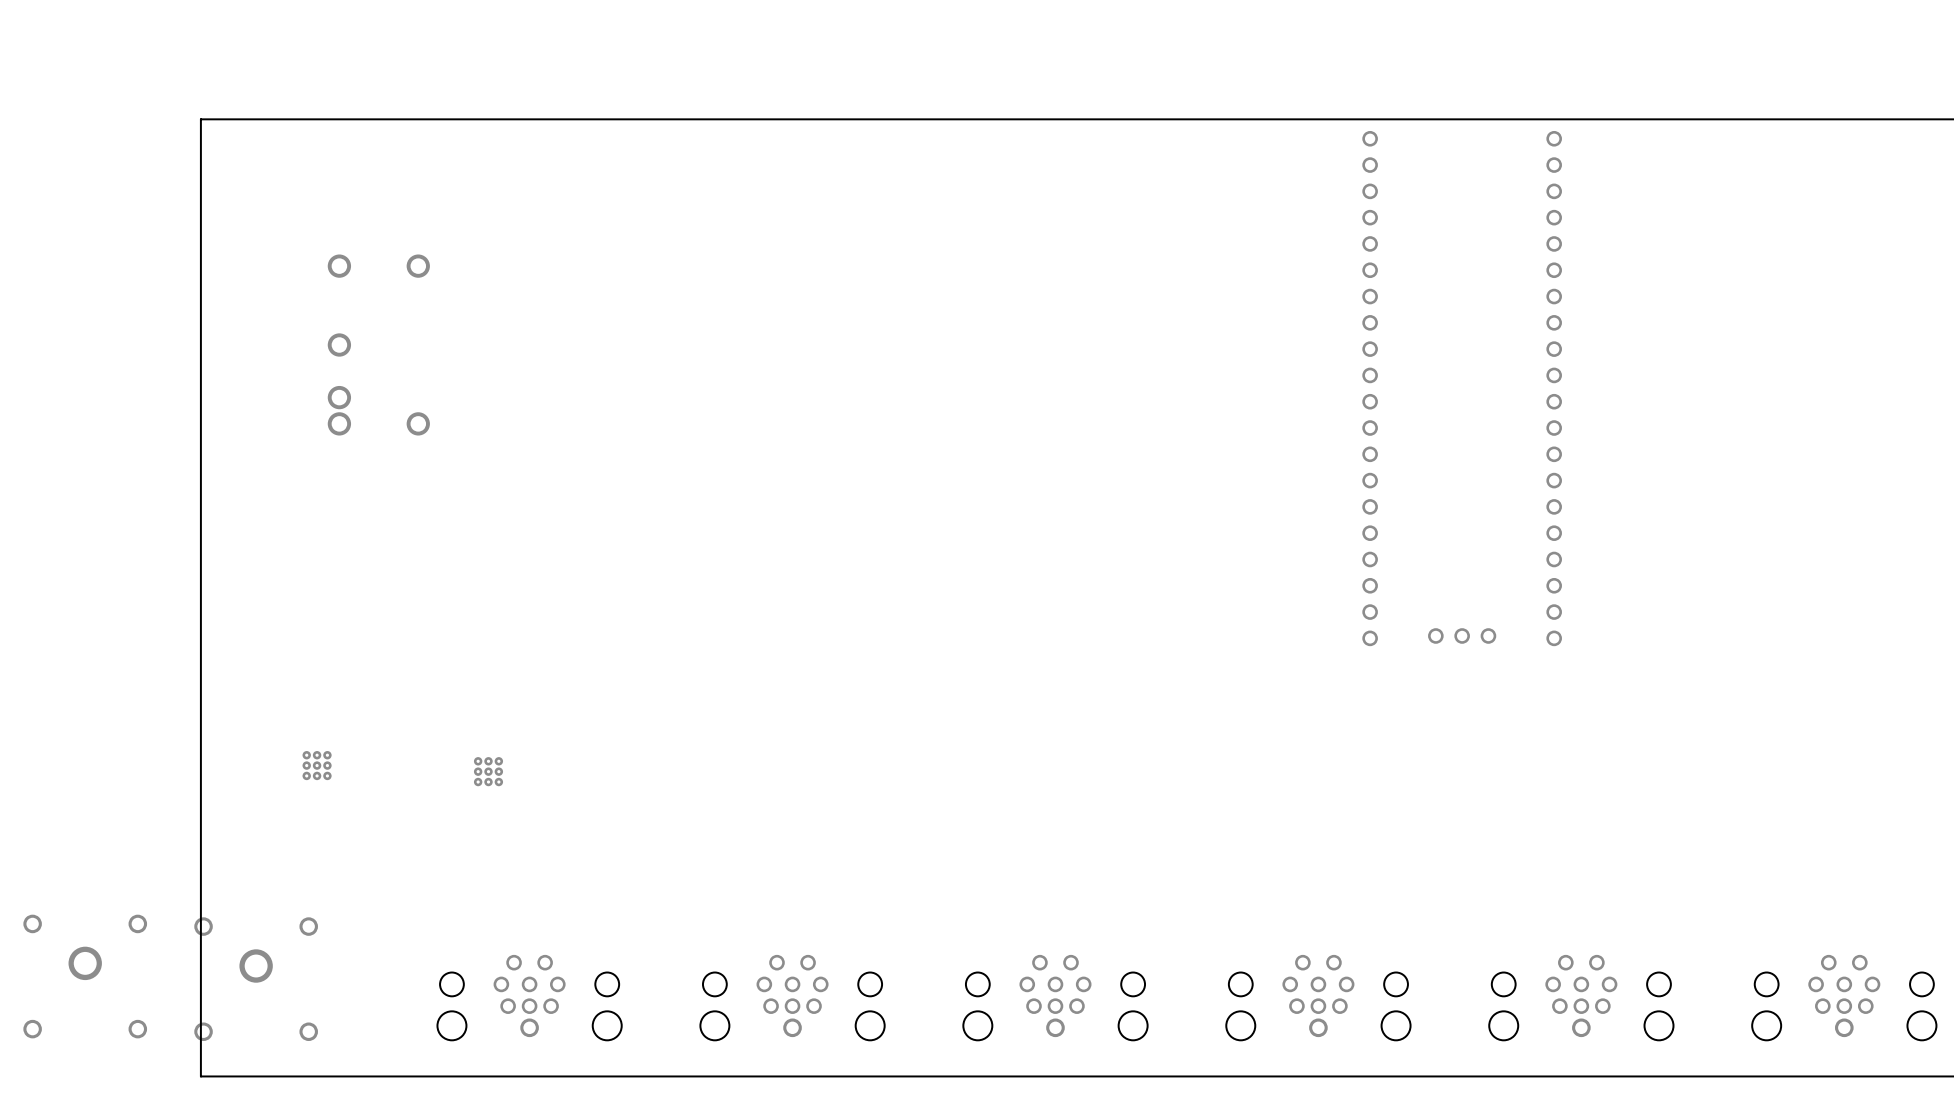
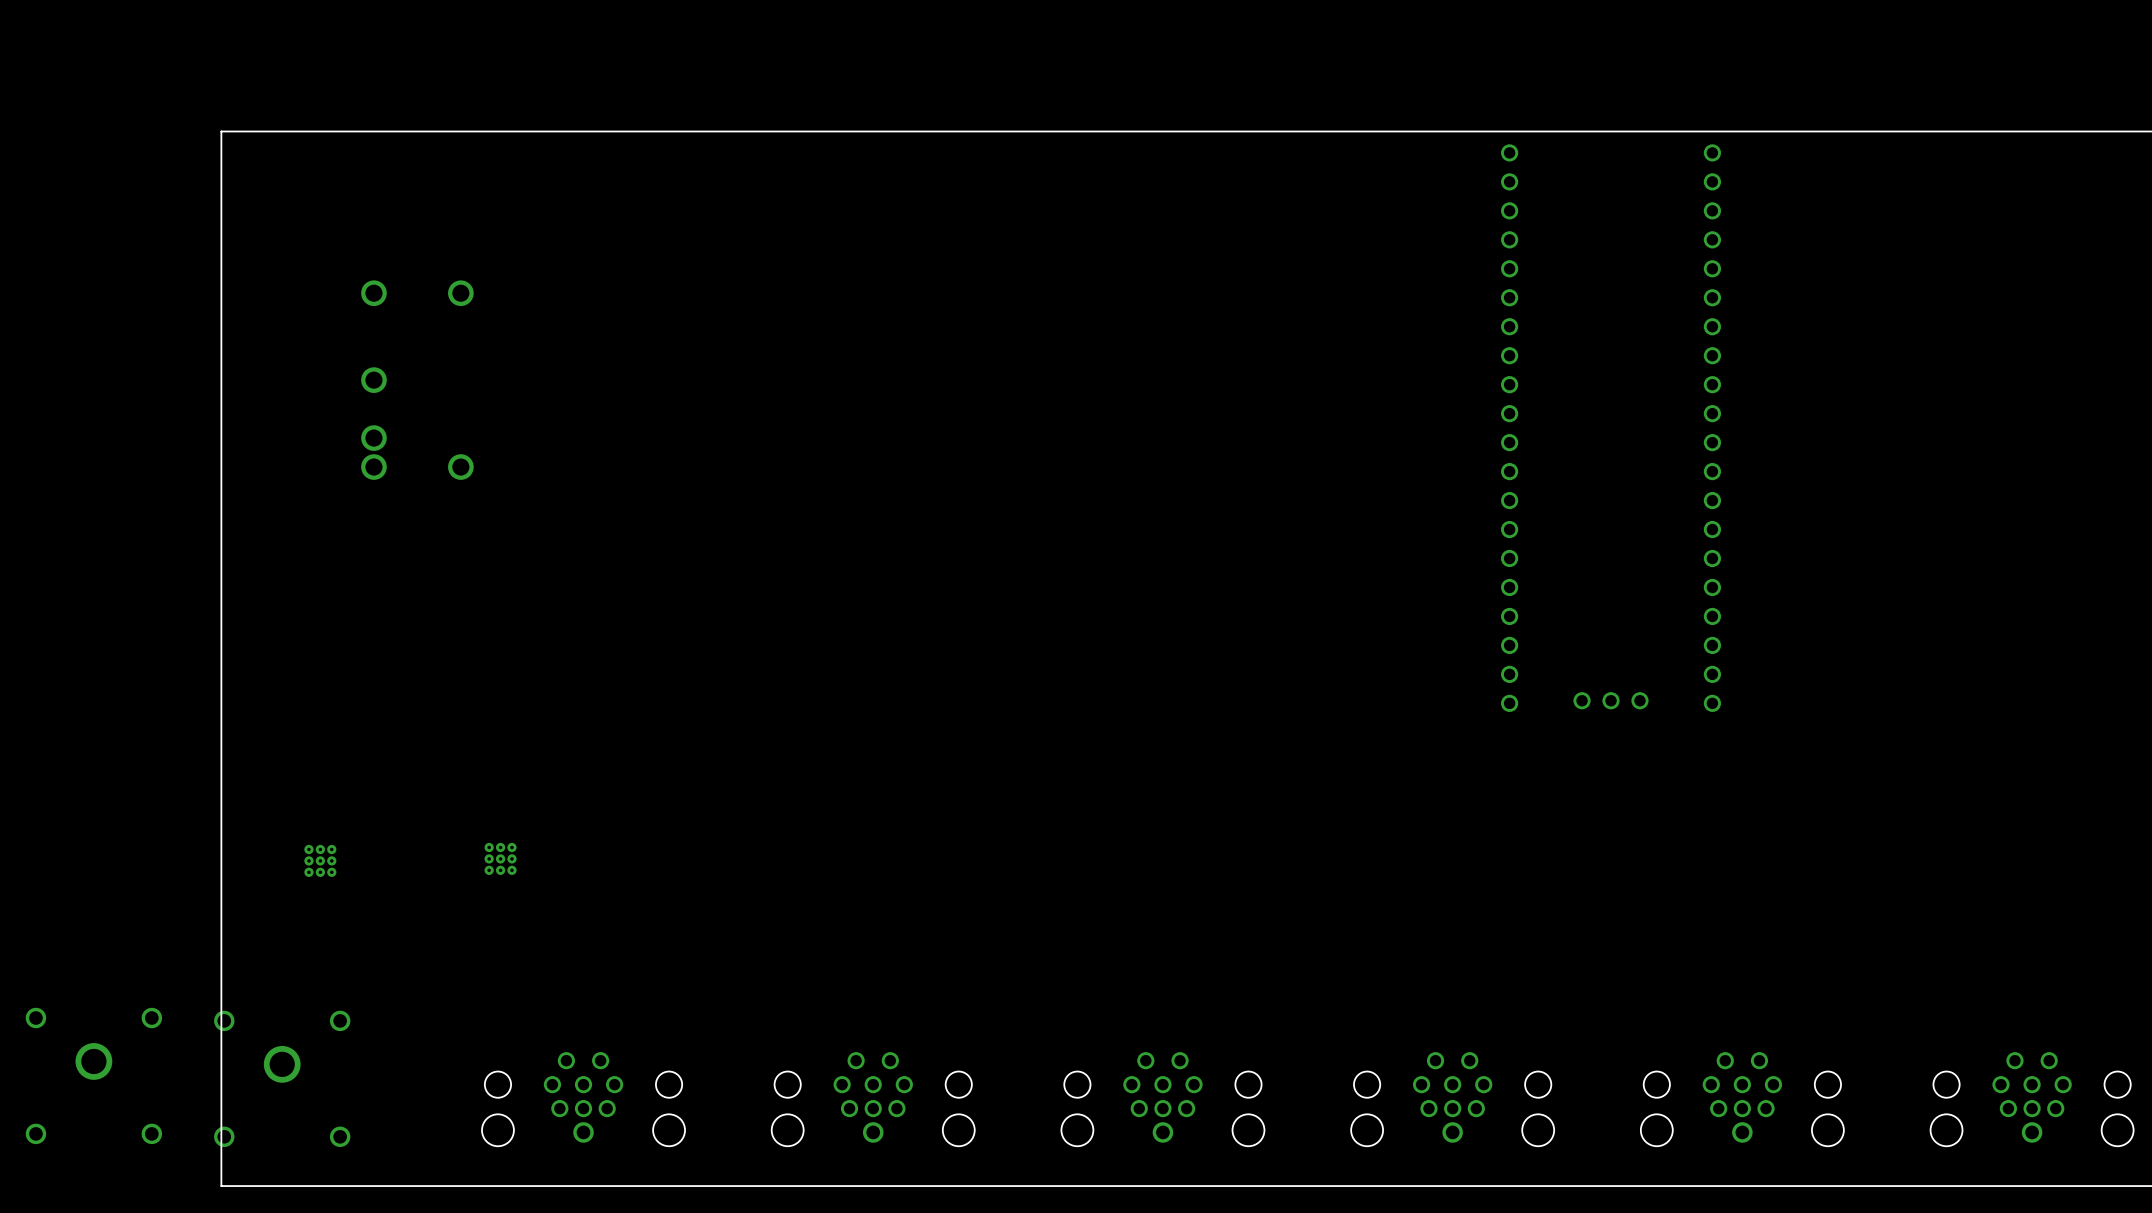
part position: (317, 765) -> (320, 860)
part position: (488, 771) -> (500, 858)

